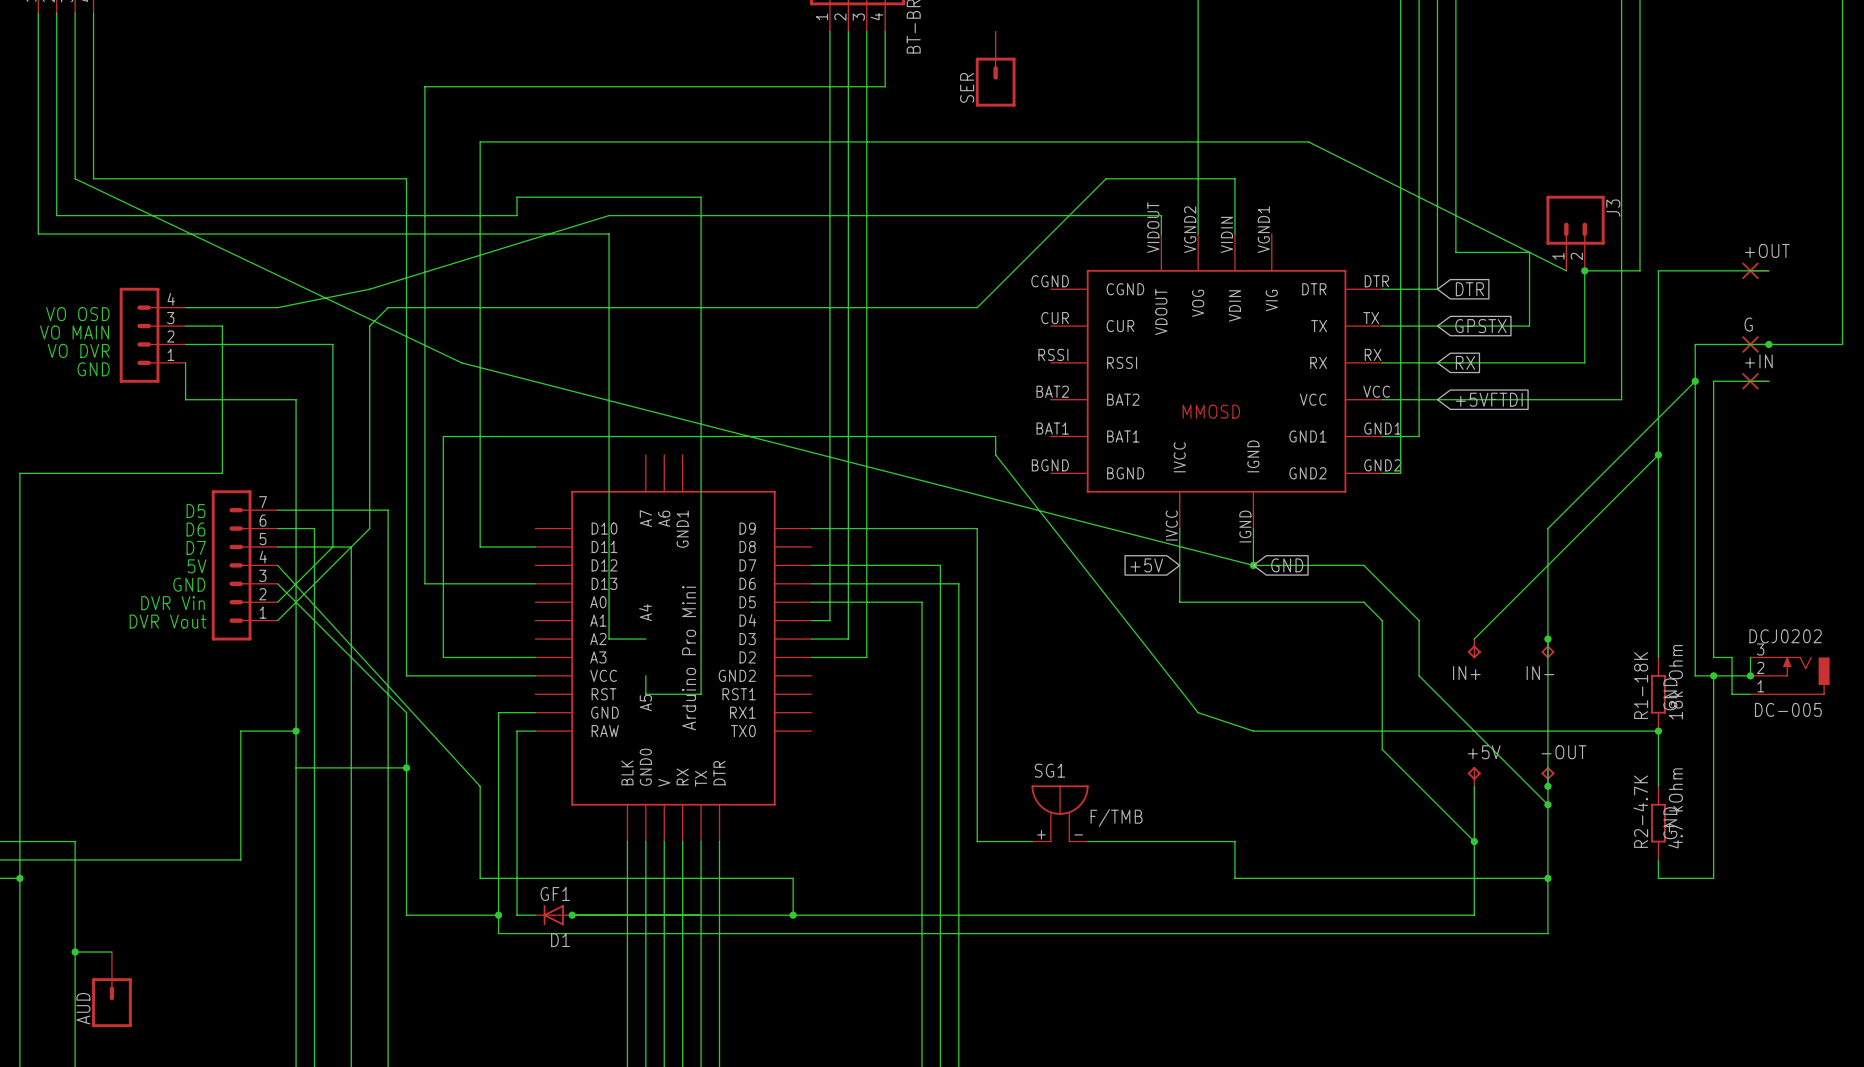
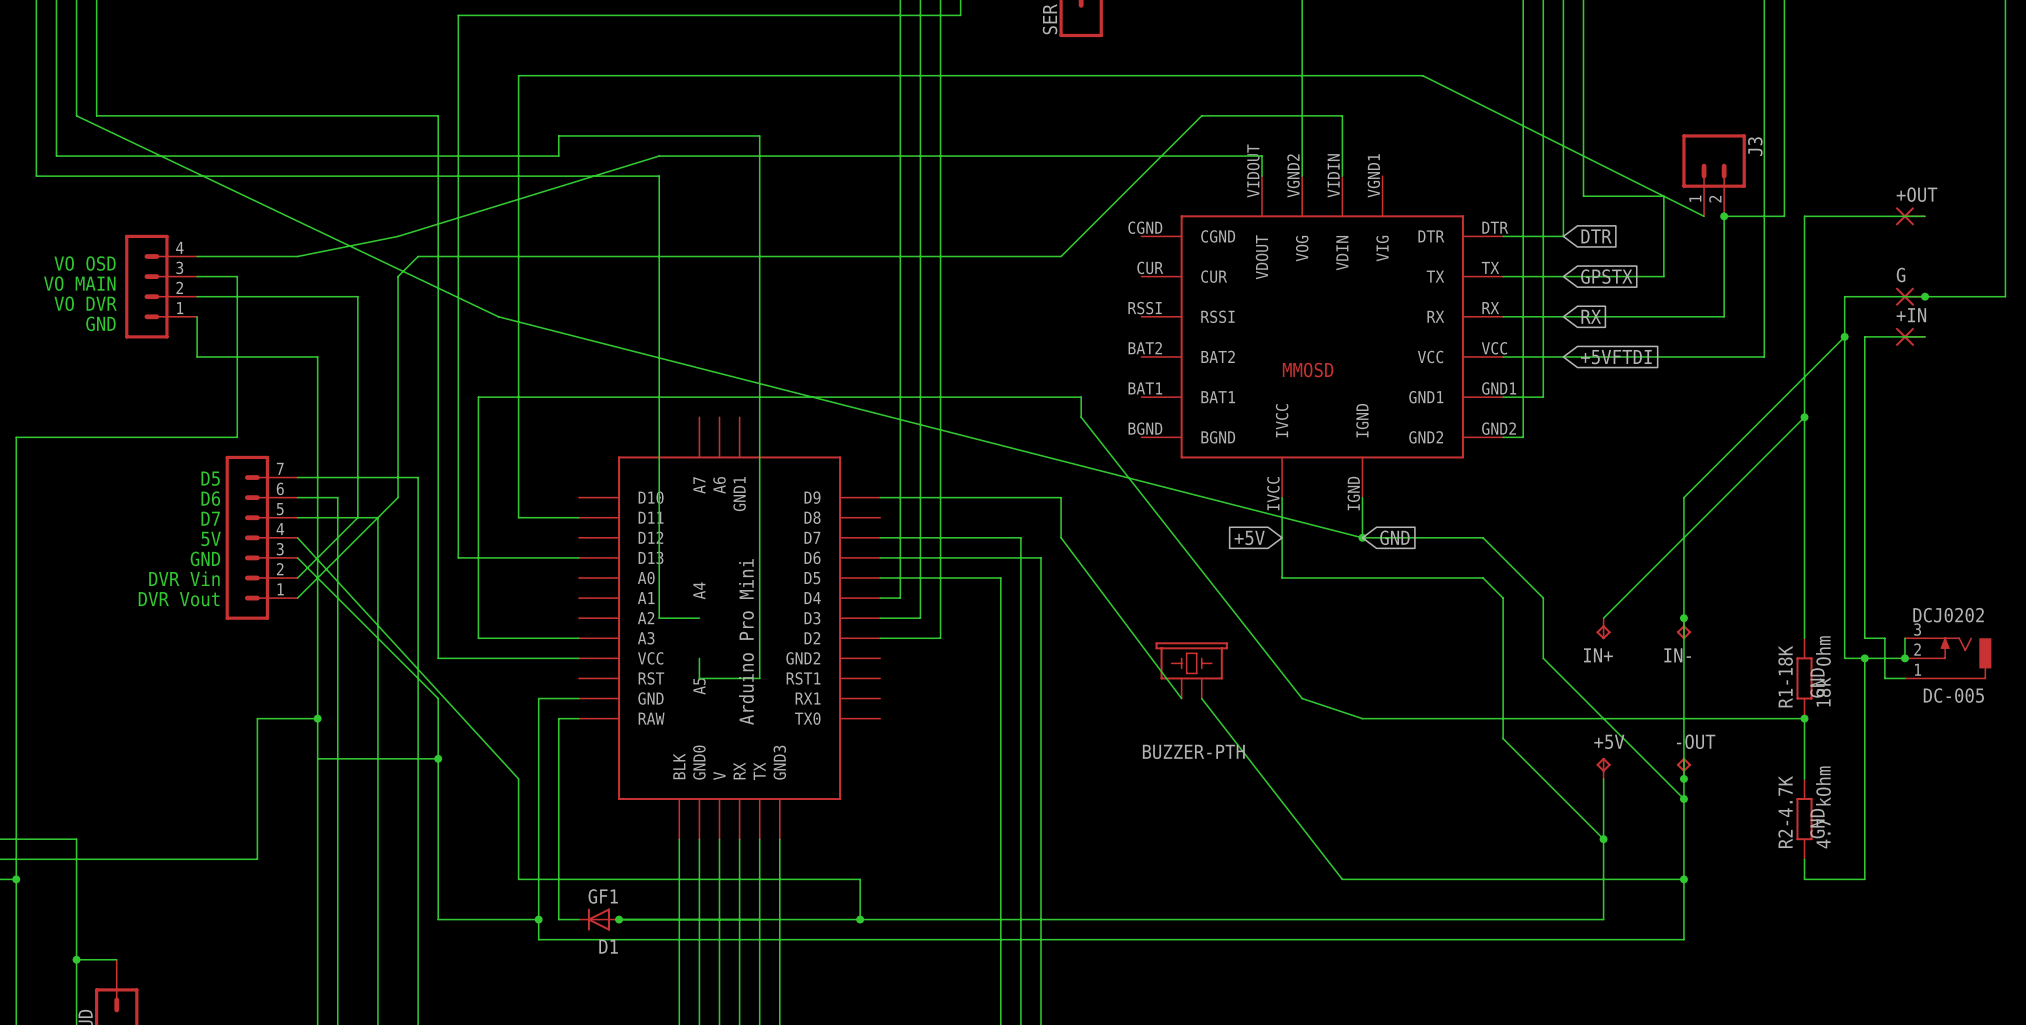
wire: (977, 565) (977, 841) (1032, 841) -> (1061, 537) (1181, 698)
part: none -> BUZZER-PTH (1191, 670)
part pin name: DTR (719, 773) -> GND3 (779, 762)
SG1: F/TMB (1060, 813) -> none
wire: (1087, 841) (1234, 841) (1234, 878) -> (1201, 698) (1342, 879)

